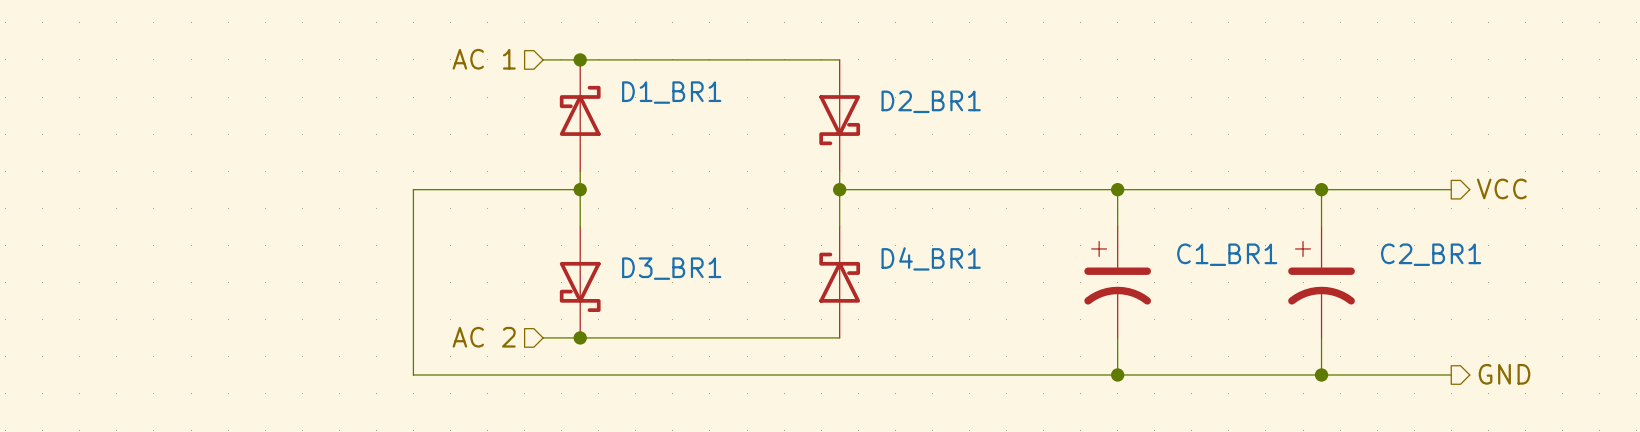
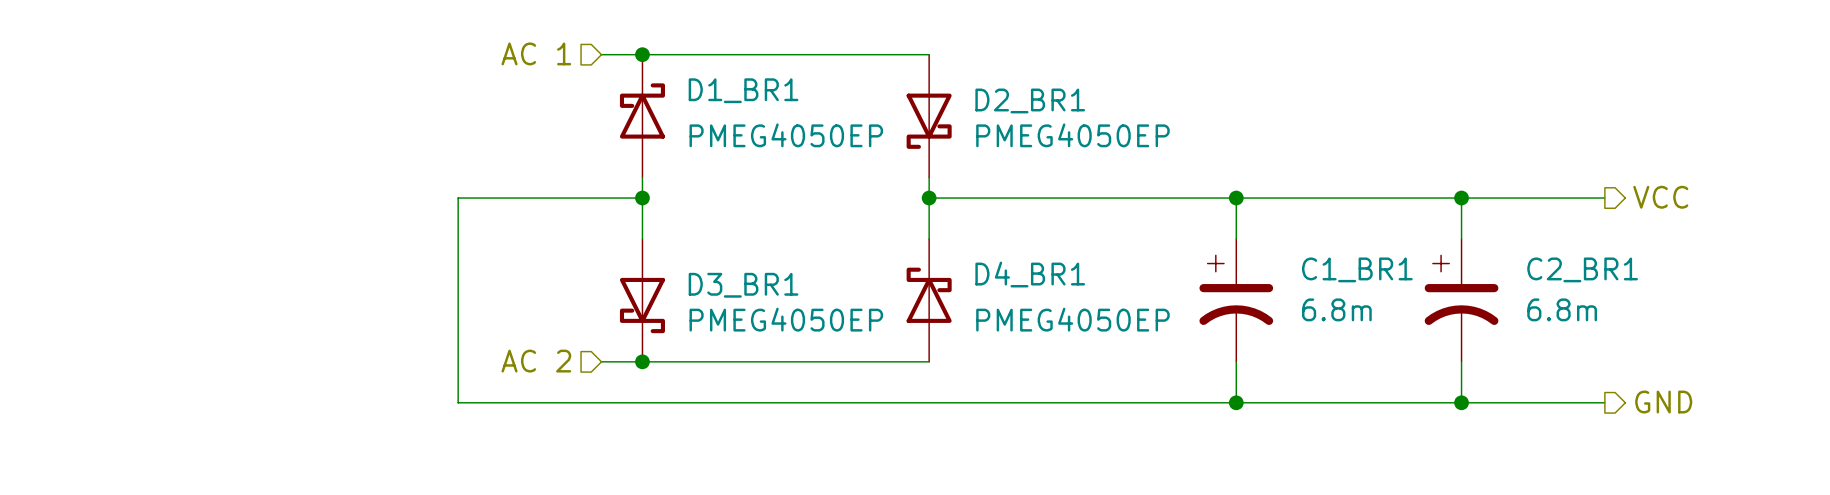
D1_BR1 value: none -> PMEG4050EP (786, 135)
D2_BR1 value: none -> PMEG4050EP (1072, 135)
C1_BR1 value: none -> 6.8m (1336, 309)
C2_BR1 value: none -> 6.8m (1562, 309)
D3_BR1 value: none -> PMEG4050EP (786, 319)
D4_BR1 value: none -> PMEG4050EP (1072, 319)

